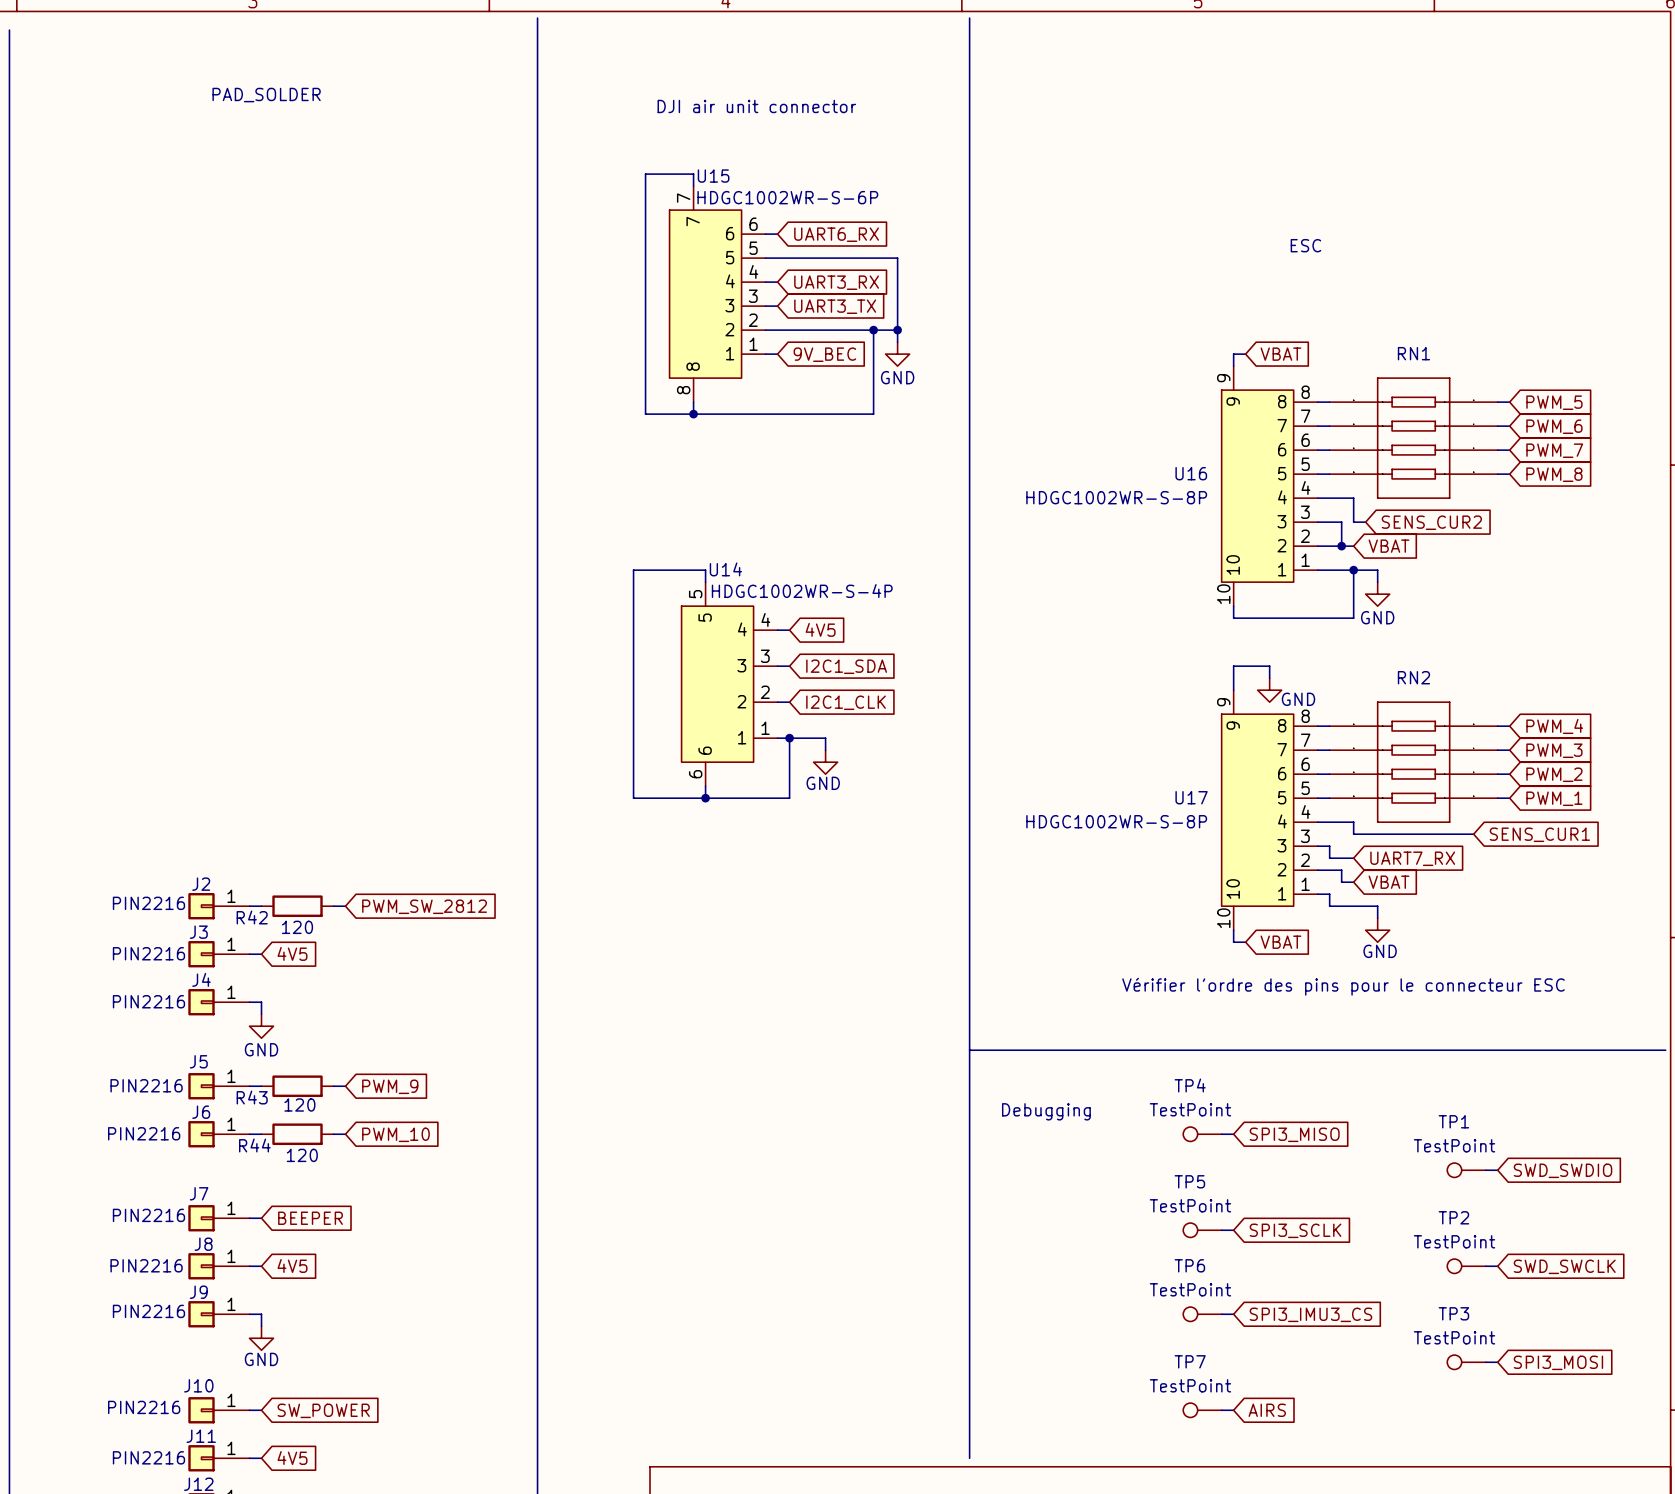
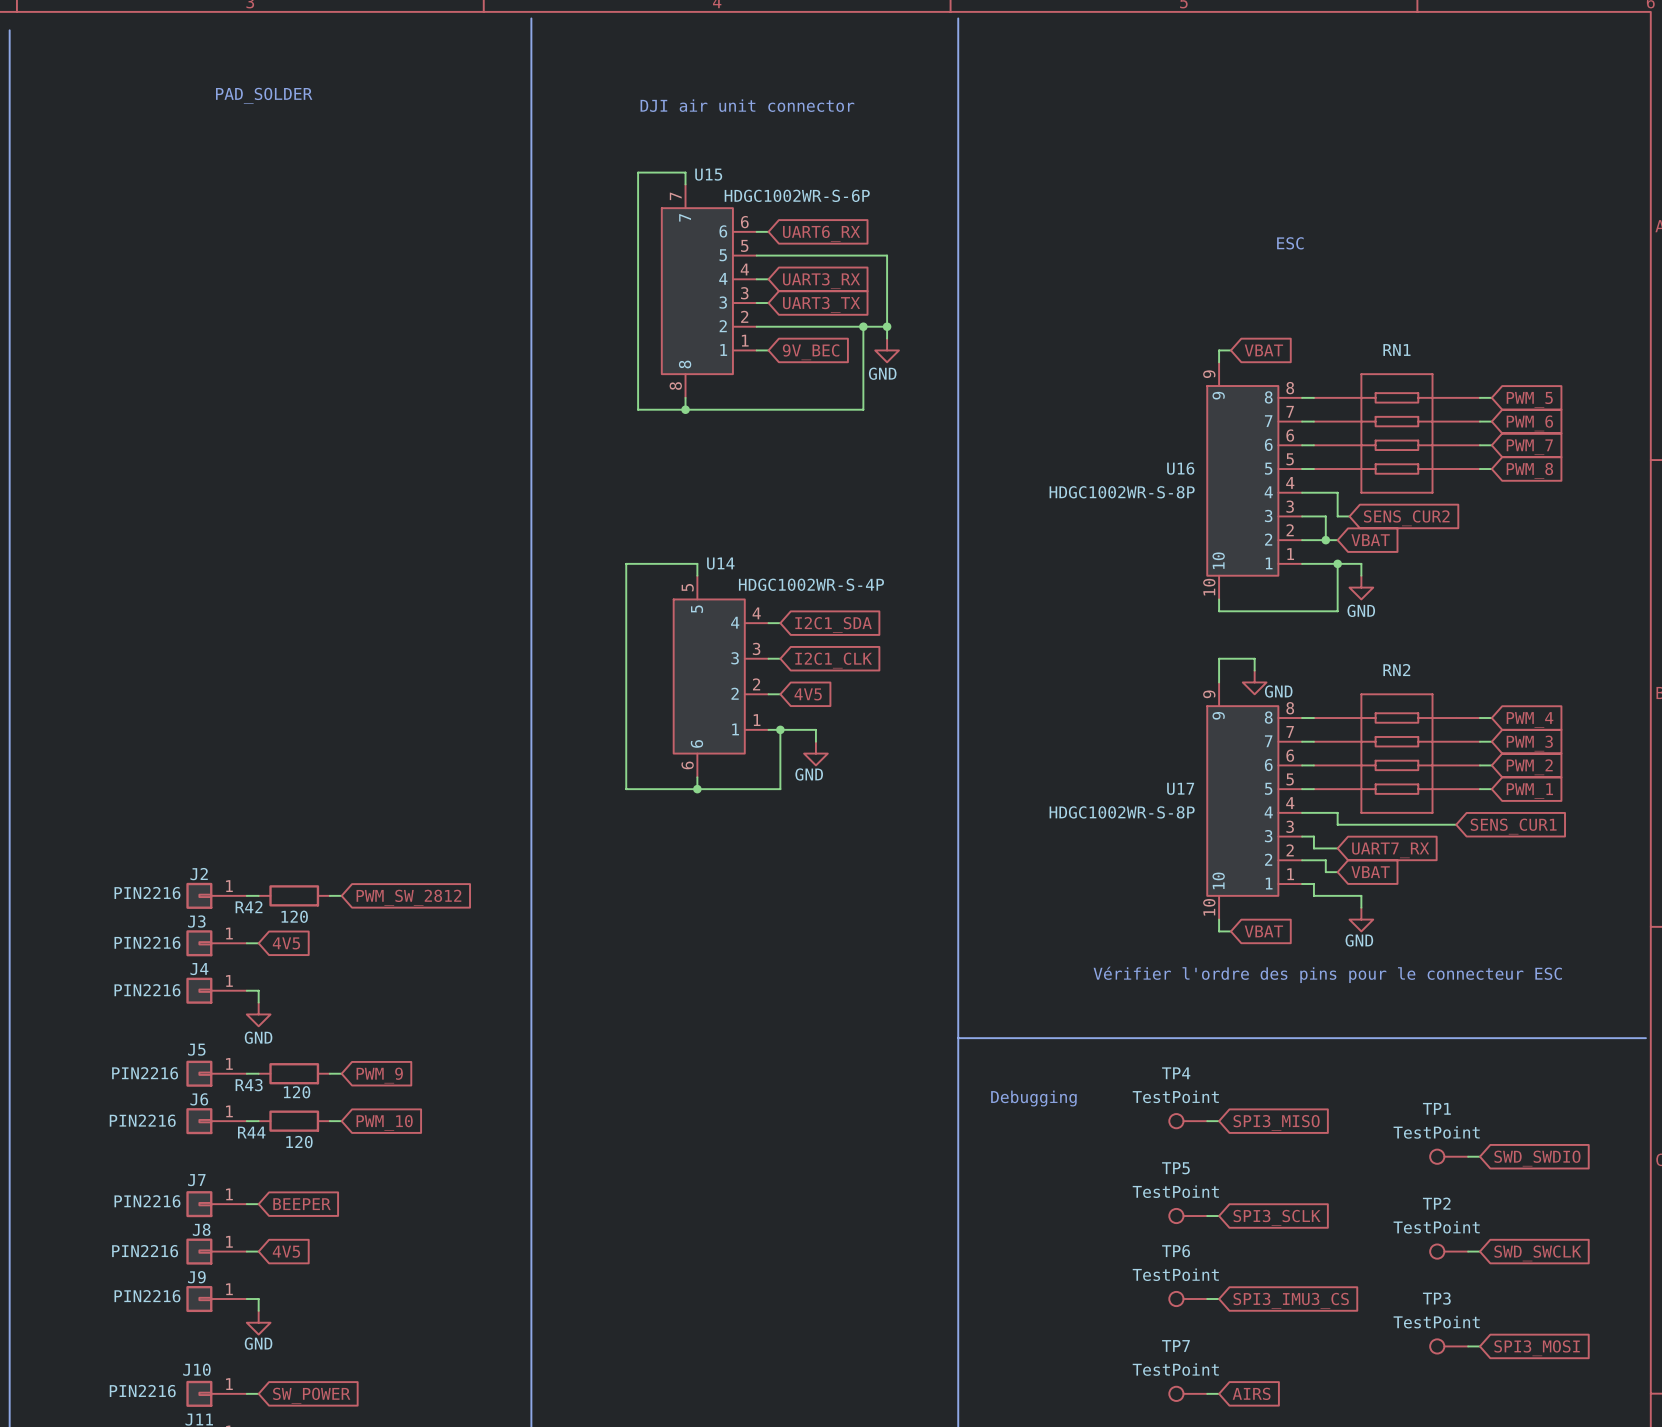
global label: 4V5 (820, 629) -> I2C1_SDA (833, 624)
global label: I2C1_SDA (846, 666) -> I2C1_CLK (833, 660)
global label: I2C1_CLK (846, 702) -> 4V5 (808, 694)

